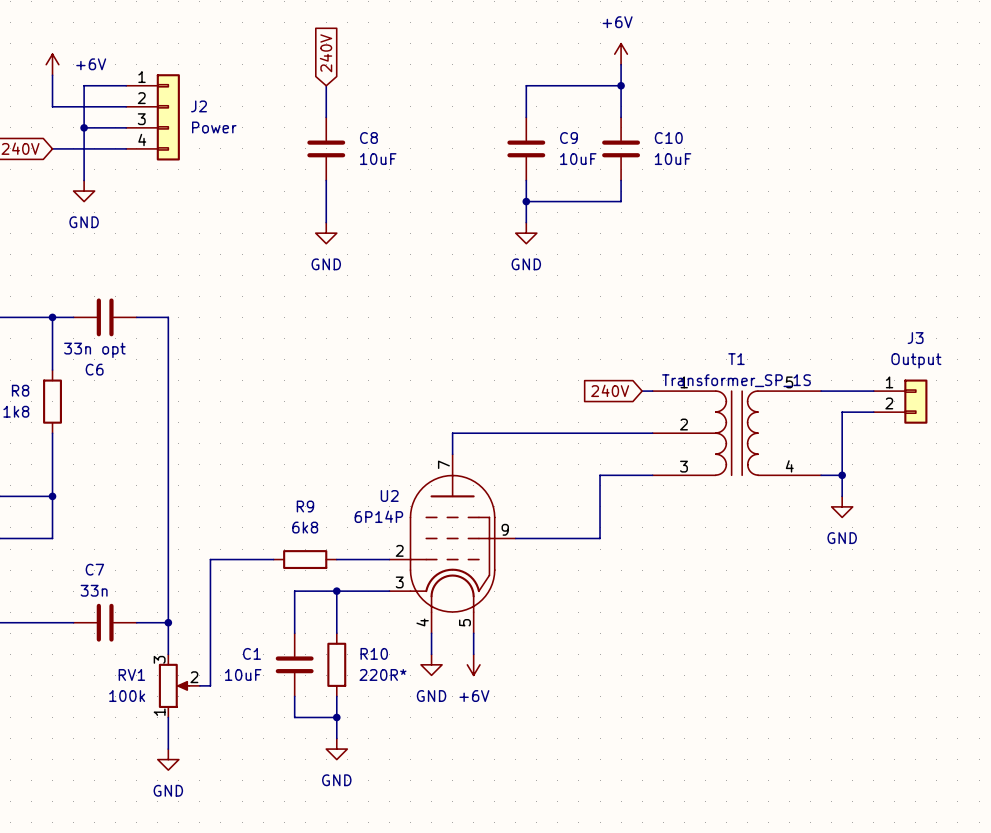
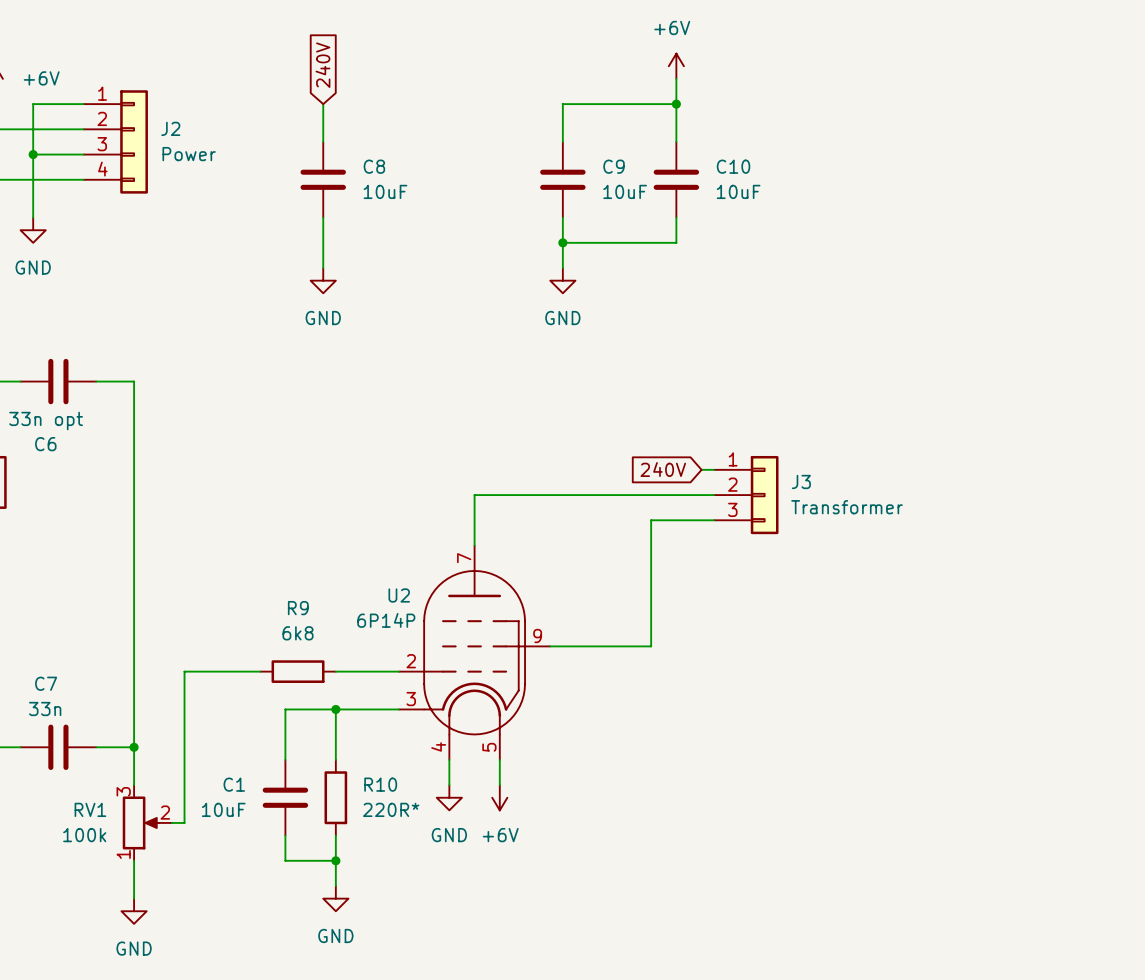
J3 name position: J3 (915, 338) -> J3 (801, 481)
J3 value: Output (916, 360) -> Transformer (847, 507)
J3 symbol: [873, 379, 928, 424] -> [714, 455, 779, 535]
wire: (821, 391) (873, 391) -> none
wire: (873, 412) (842, 412) (842, 496) -> none
wire: (452, 433) (600, 433) -> (474, 520) (474, 495) (714, 495)
T1: Transformer_SP_1S (736, 433) -> none
wire: (600, 475) (652, 475) -> (651, 570) (651, 520)
wire: (821, 475) (842, 475) -> none
junction: (842, 475) -> none
power symbol: GND (842, 506) -> none

